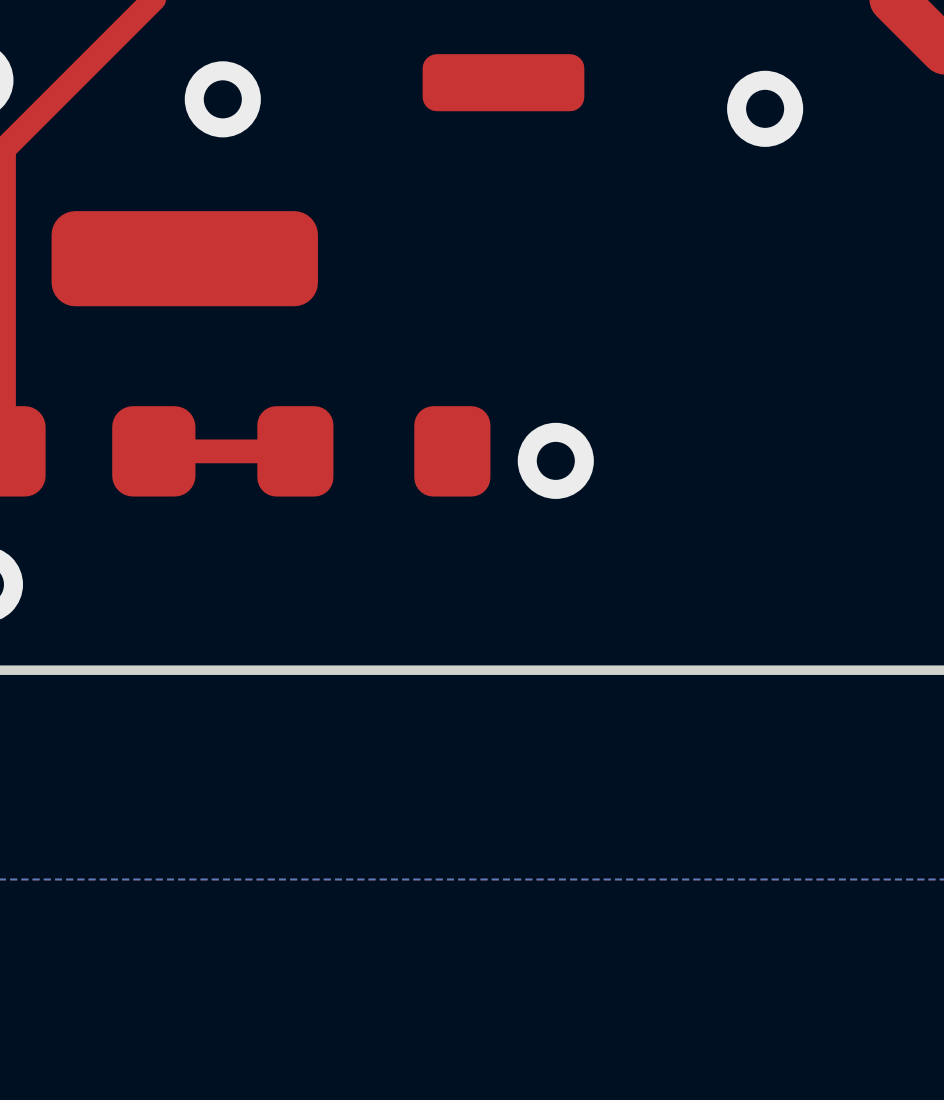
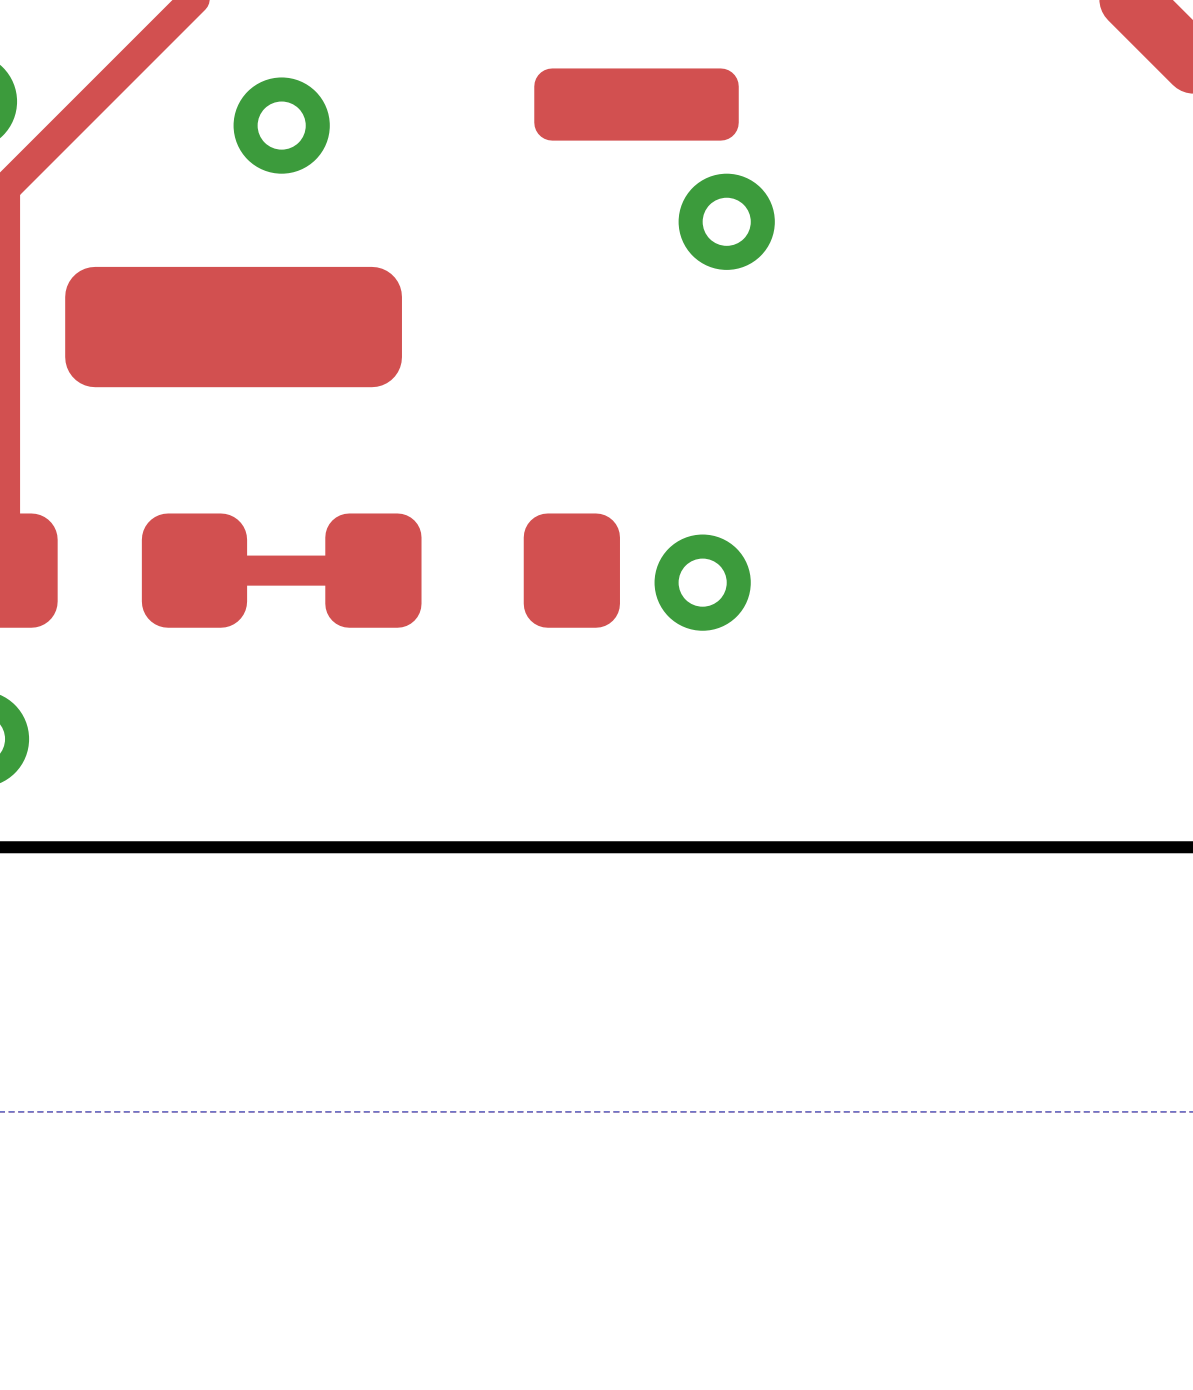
via position: (765, 108) -> (726, 221)

